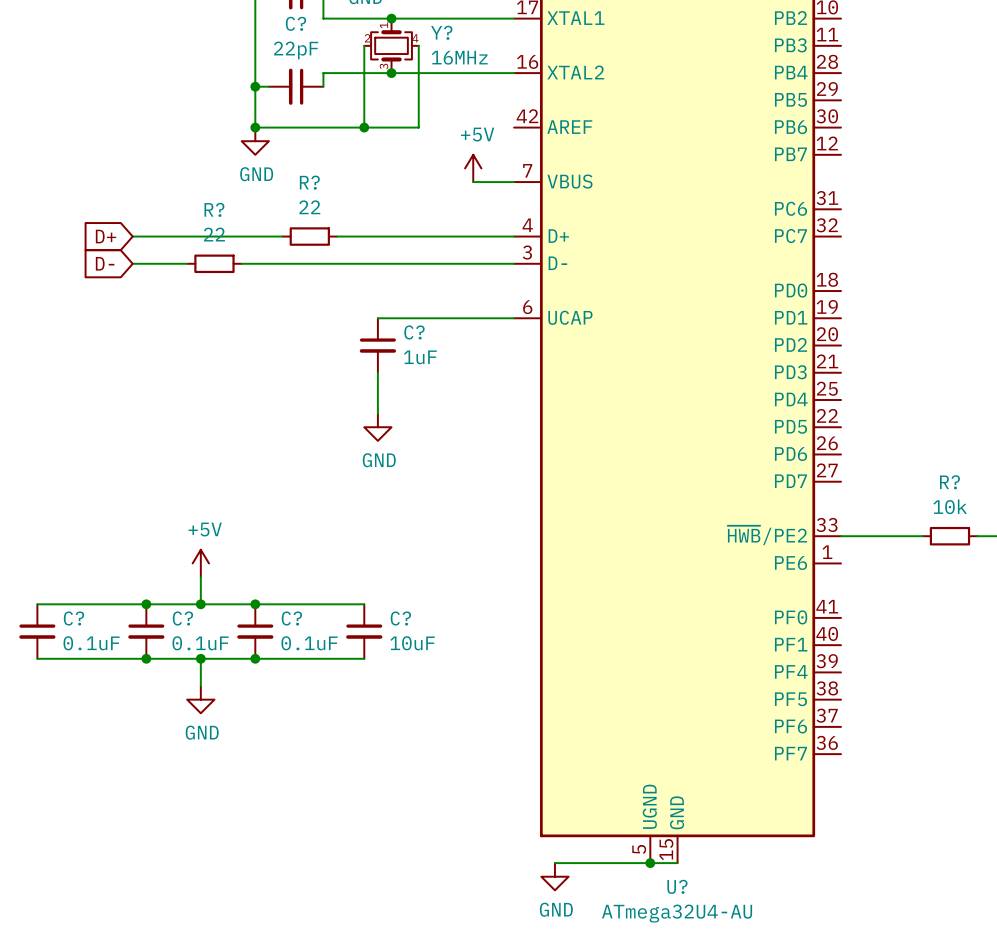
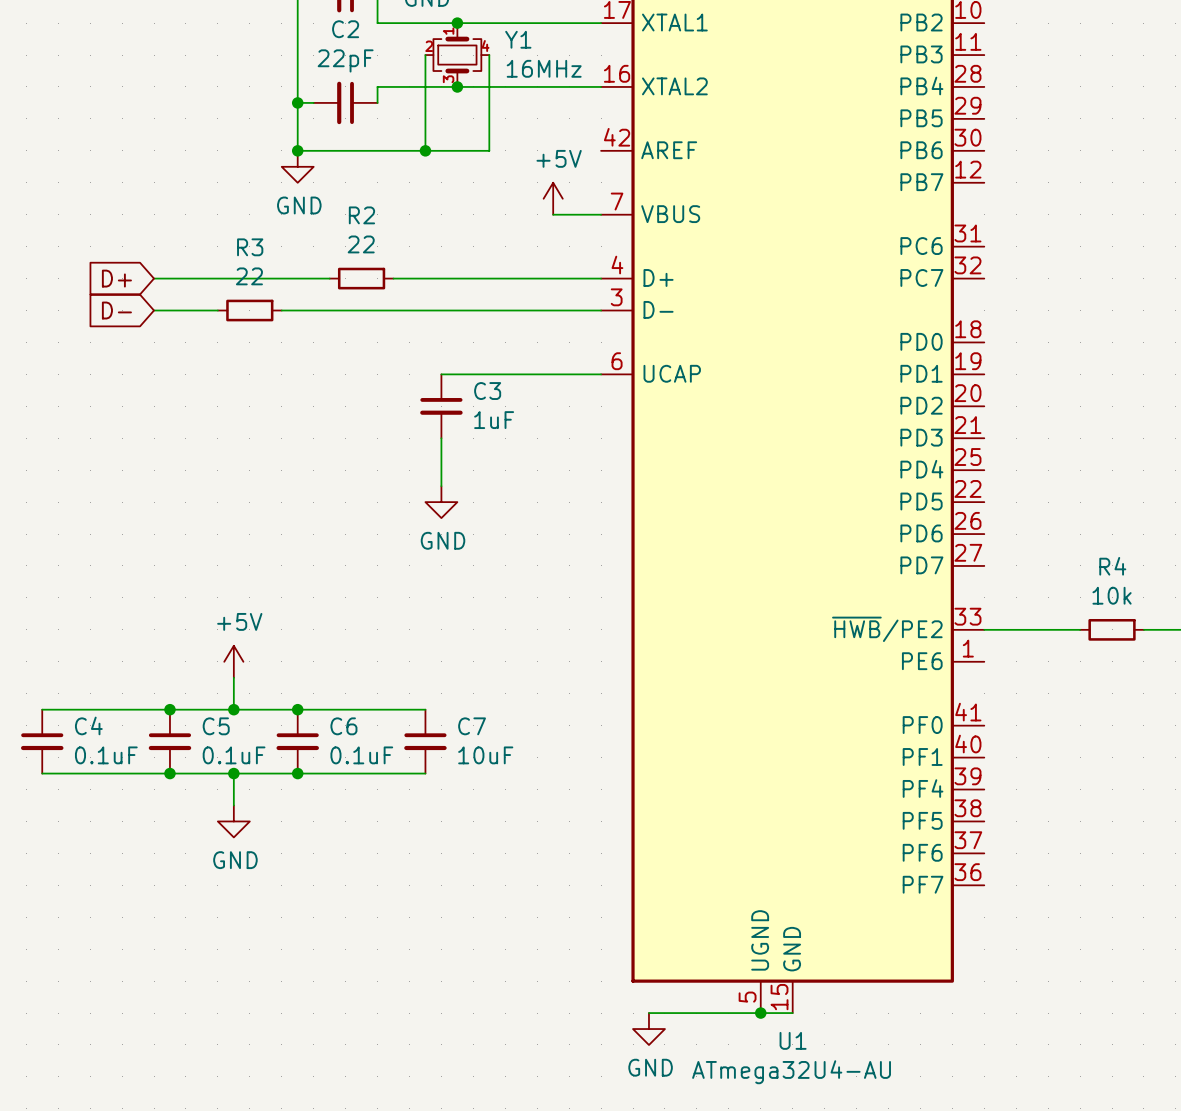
C? name: C? (295, 23) -> C2 (345, 29)
Y? name: Y? (441, 32) -> Y1 (518, 39)
R? name: R? (309, 182) -> R2 (361, 215)
R? name: R? (214, 209) -> R3 (250, 247)
C? name: C? (414, 332) -> C3 (487, 391)
R? name: R? (949, 482) -> R4 (1112, 566)
C? name: C? (73, 618) -> C4 (88, 725)
C? name: C? (182, 618) -> C5 (216, 726)
C? name: C? (291, 618) -> C6 (343, 726)
C? name: C? (400, 618) -> C7 (472, 726)
U? name: U? (677, 886) -> U1 (793, 1040)

